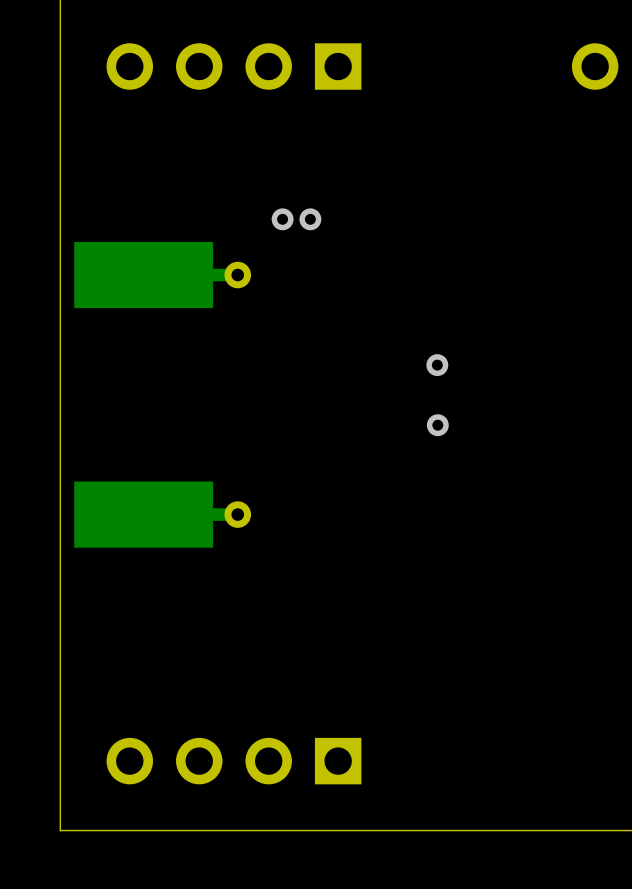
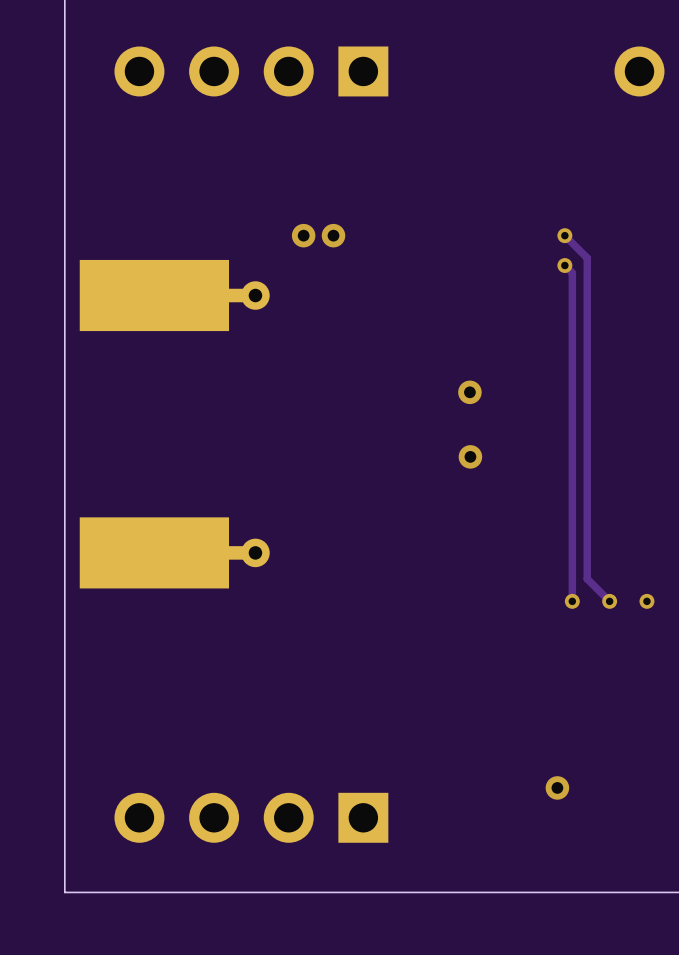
track: none -> (564, 235) (587, 258) (587, 578) (609, 601)
via: none -> (564, 235)
track: none -> (564, 265) (572, 272) (572, 601)
via: none -> (564, 265)
via: none -> (572, 601)
via: none -> (609, 601)
via: none -> (646, 601)
via: none -> (557, 787)

